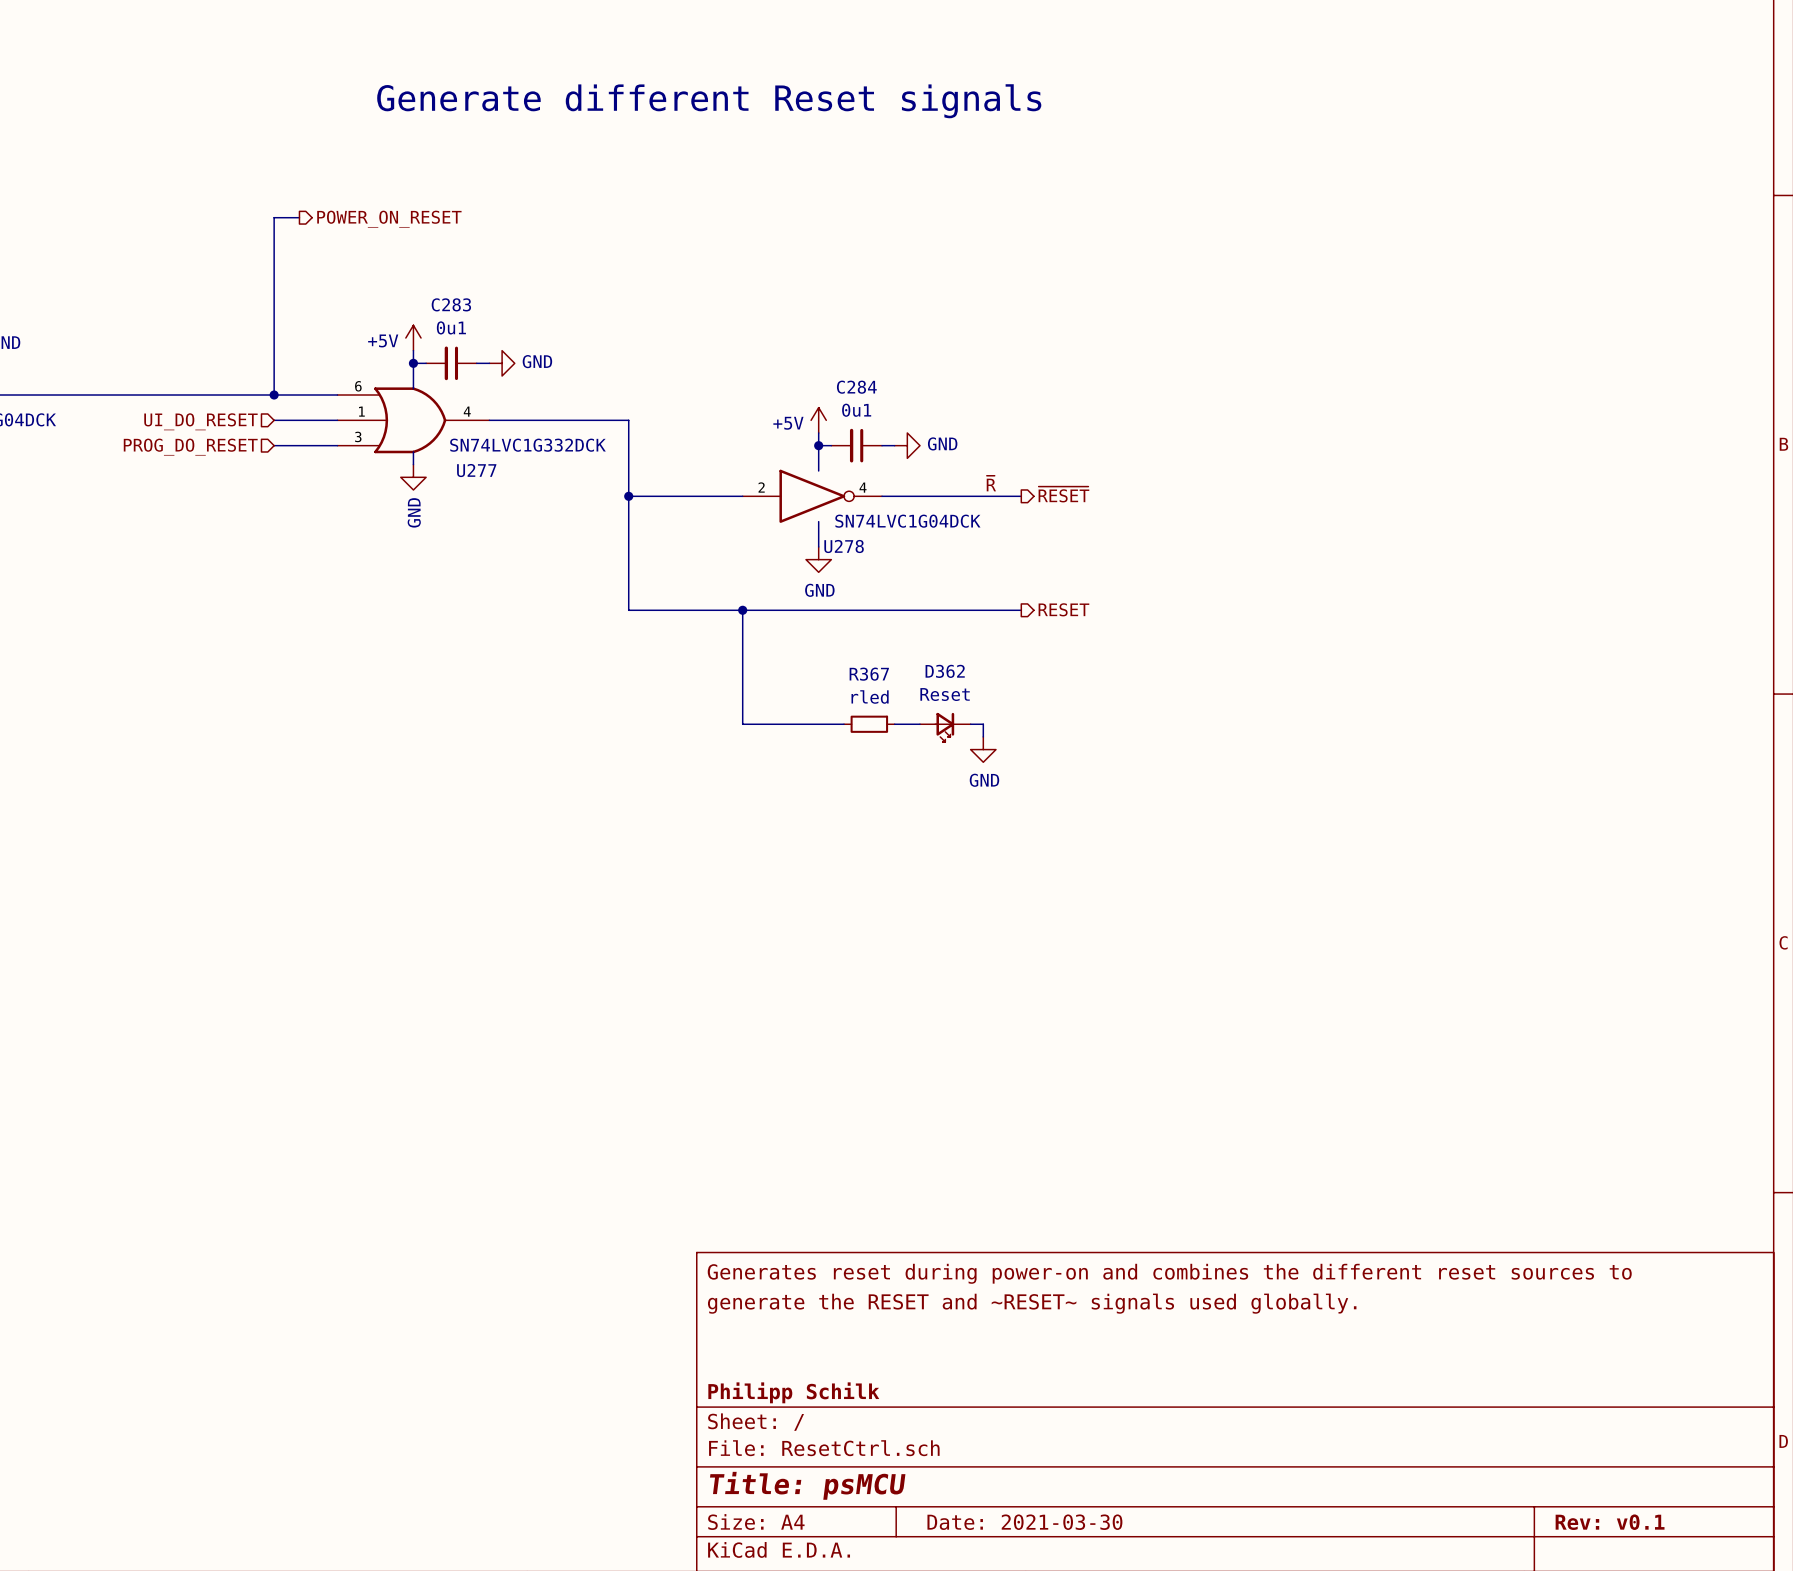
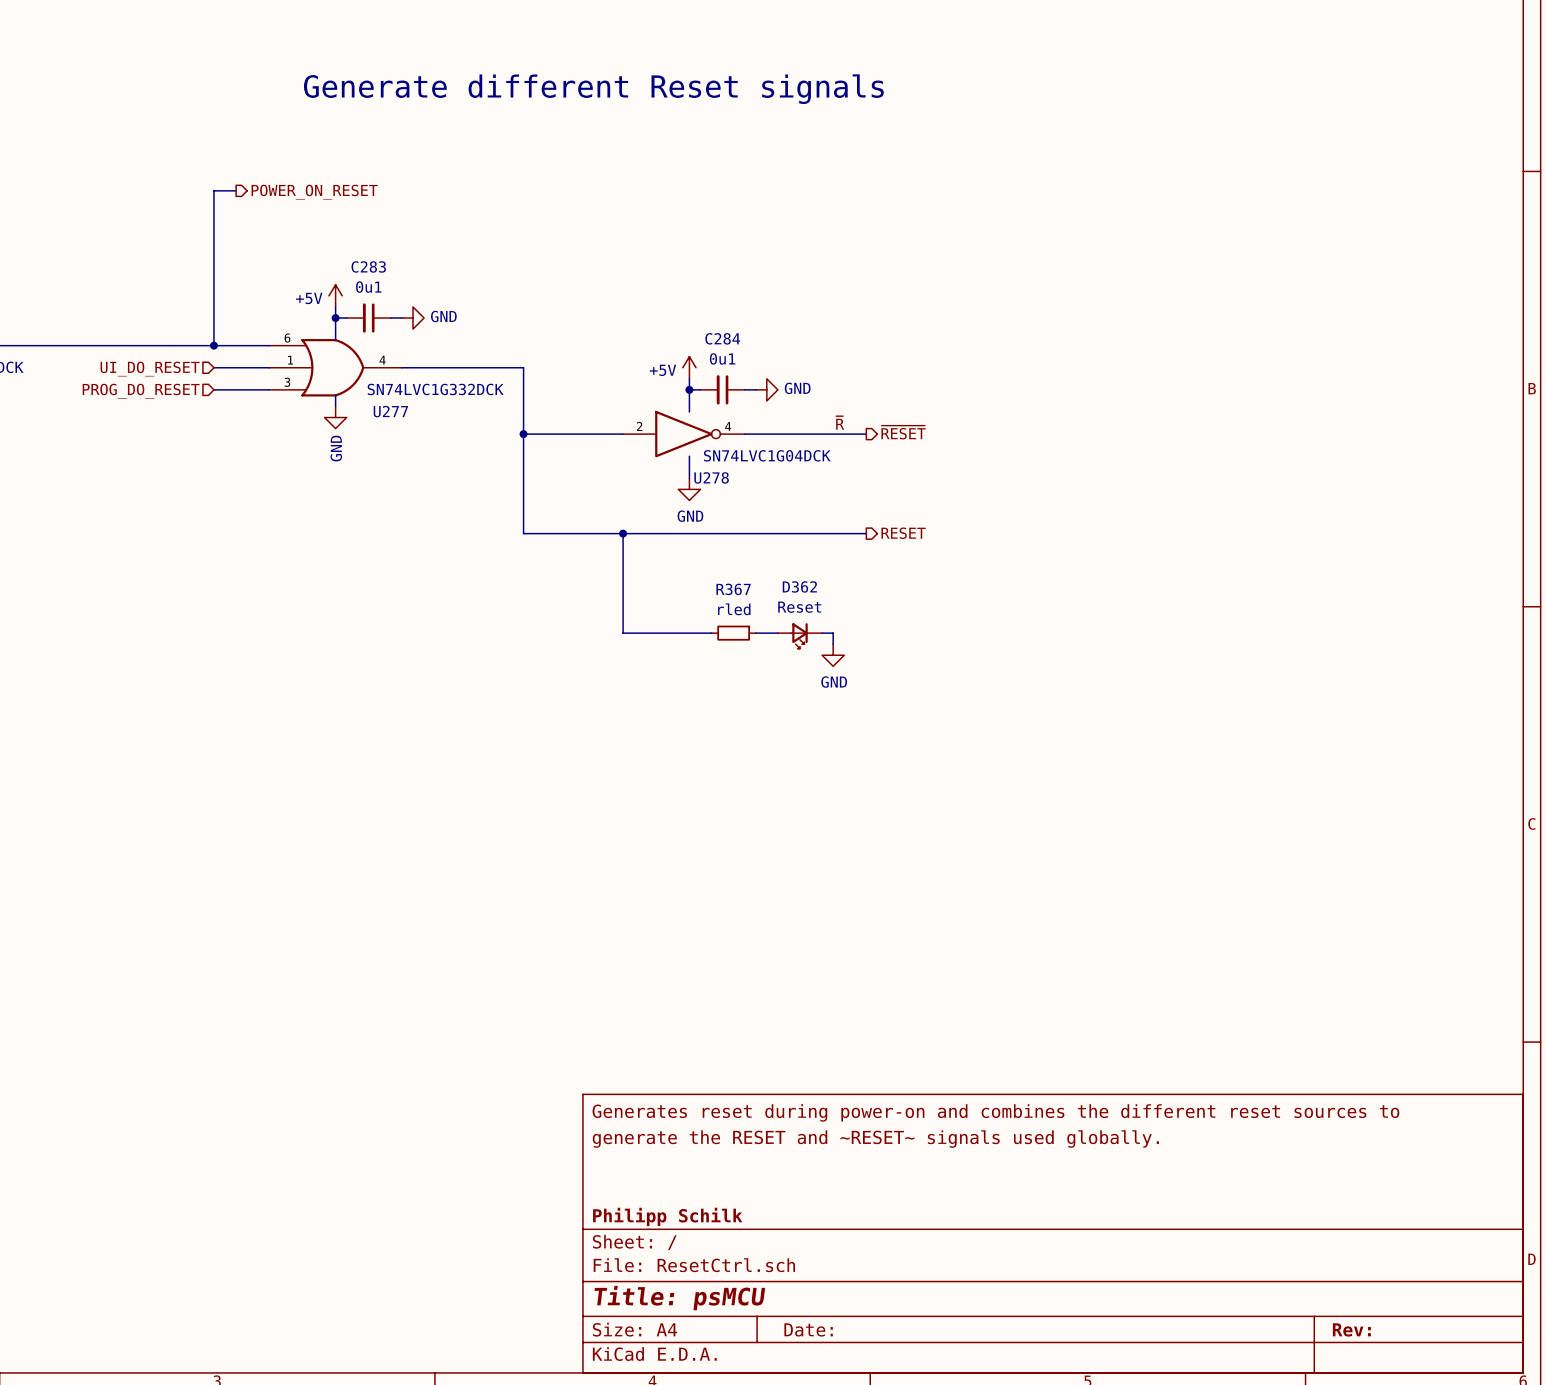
title block: Date: 2021-03-30 (1024, 1522) -> Date: (808, 1329)
title block: Rev: v0.1 (1610, 1522) -> Rev: (1351, 1329)

